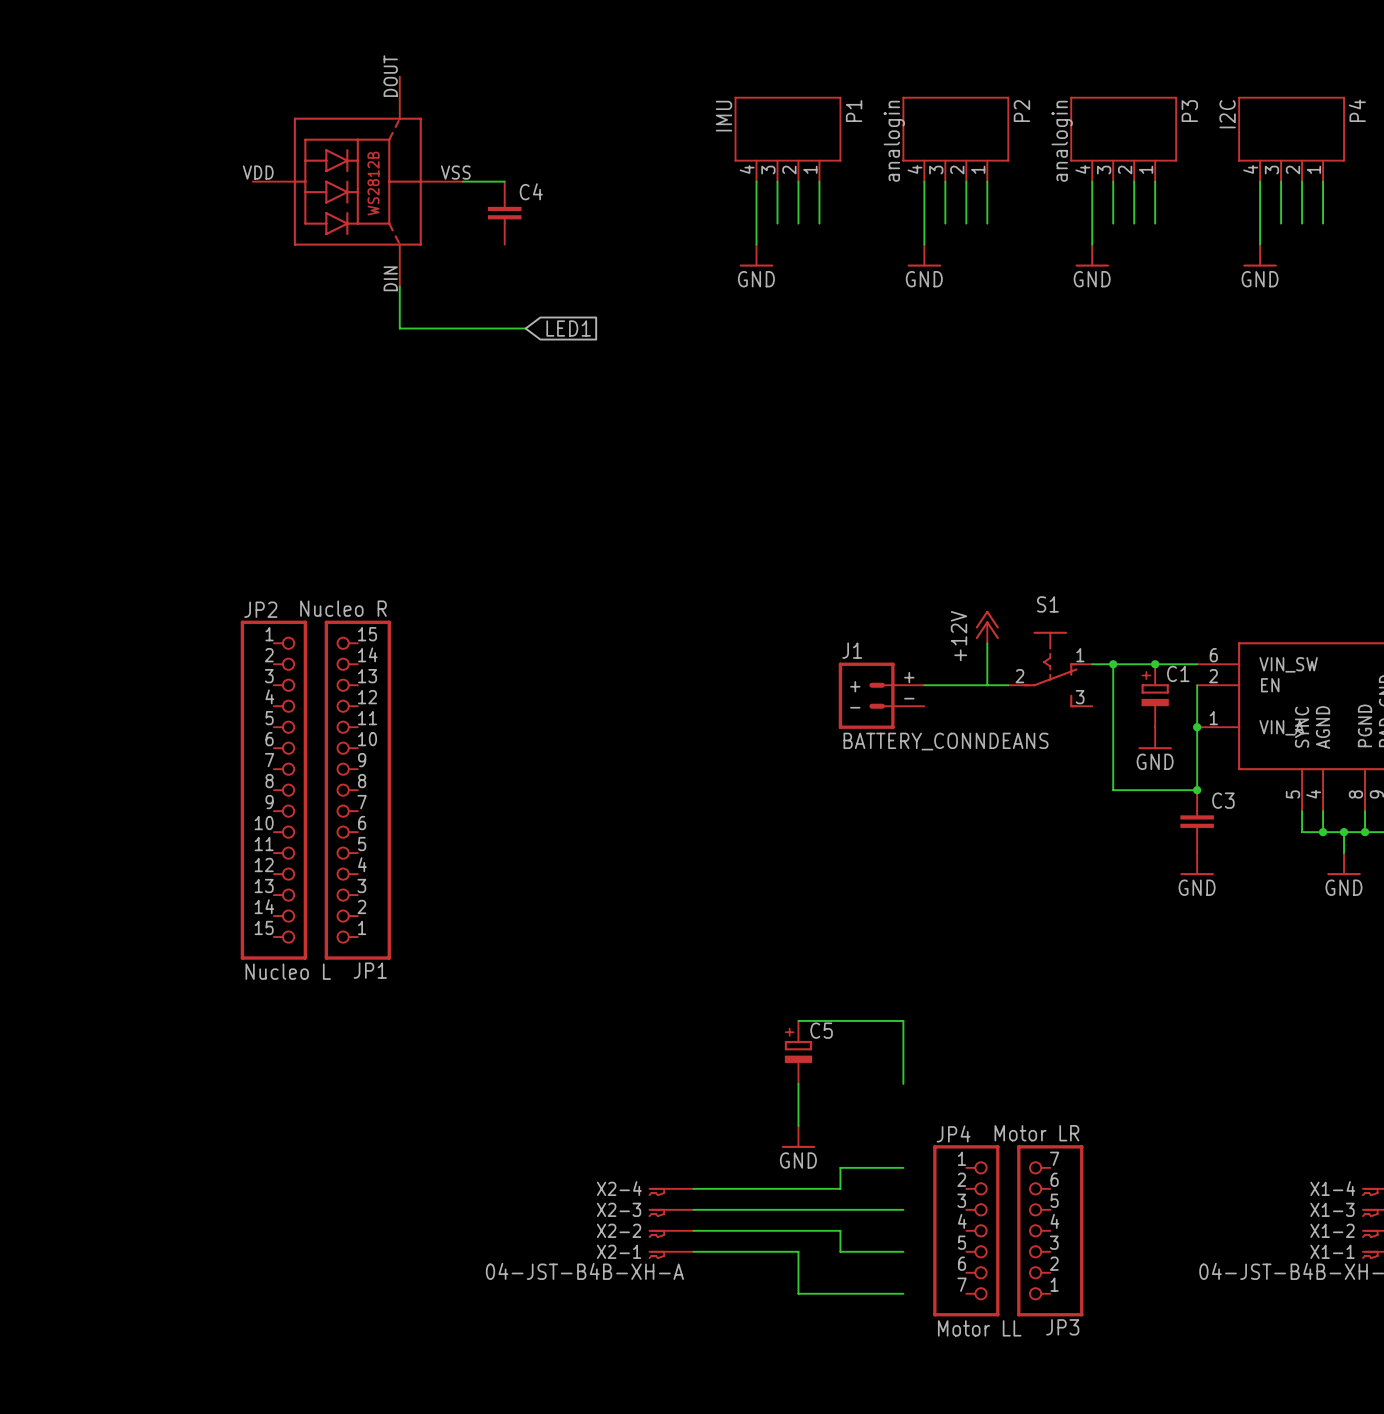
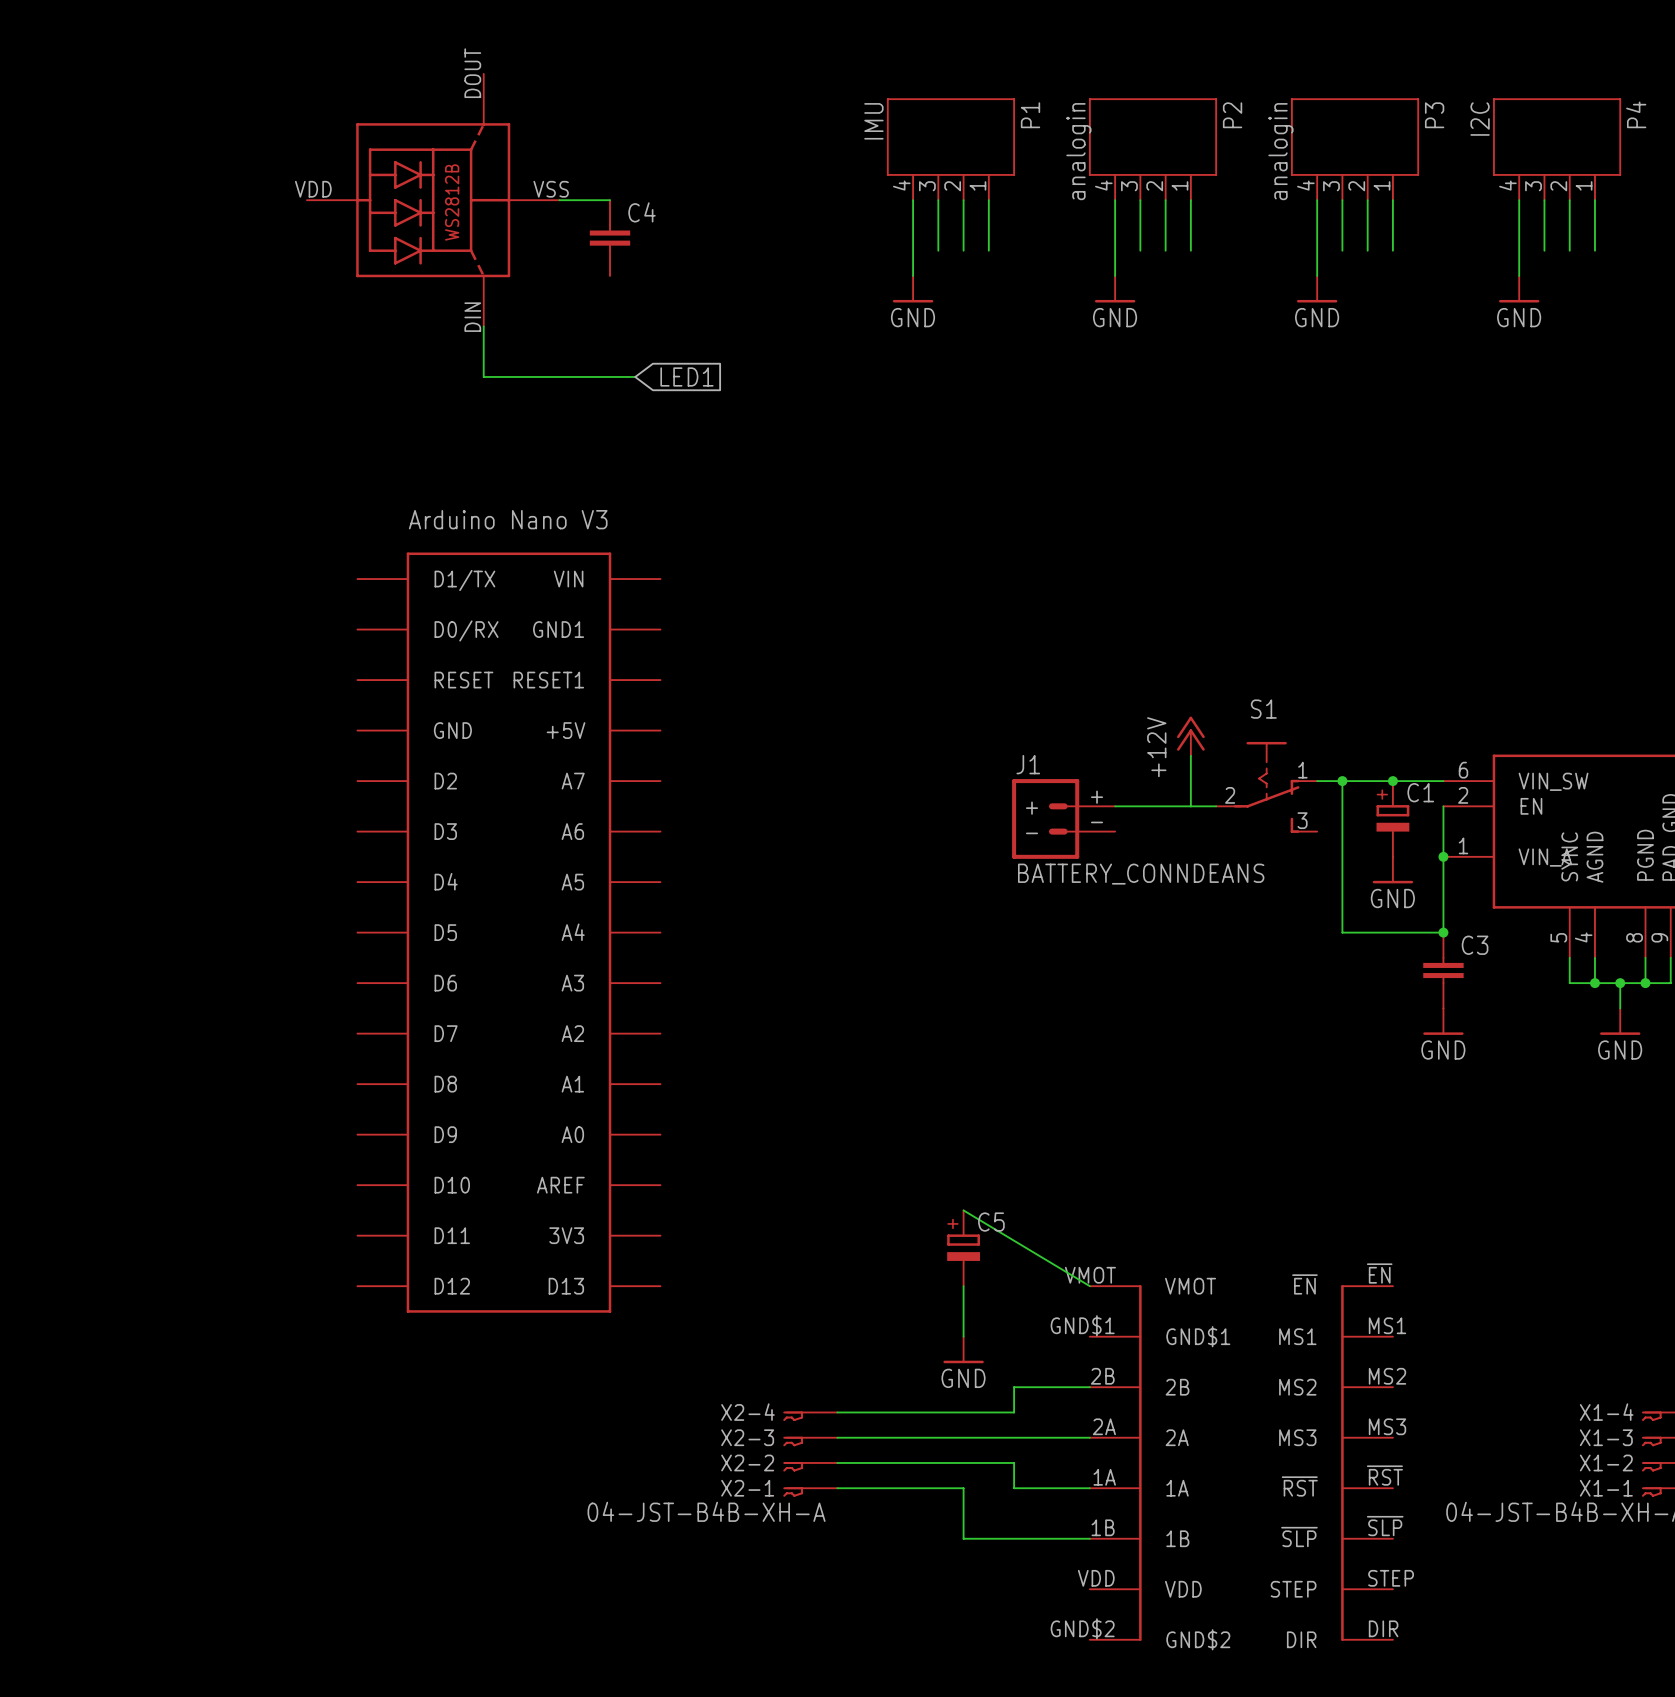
JP2: Nucleo L (273, 790) -> none
JP1: Nucleo R (357, 790) -> none
part: none -> (508, 932)
wire: (798, 1020) (903, 1020) (903, 1083) -> (963, 1210) (1089, 1286)
part: none -> (1115, 1462)
JP4: Motor LL (966, 1230) -> none
JP3: Motor LR (1050, 1230) -> none
part: none -> (1367, 1462)

